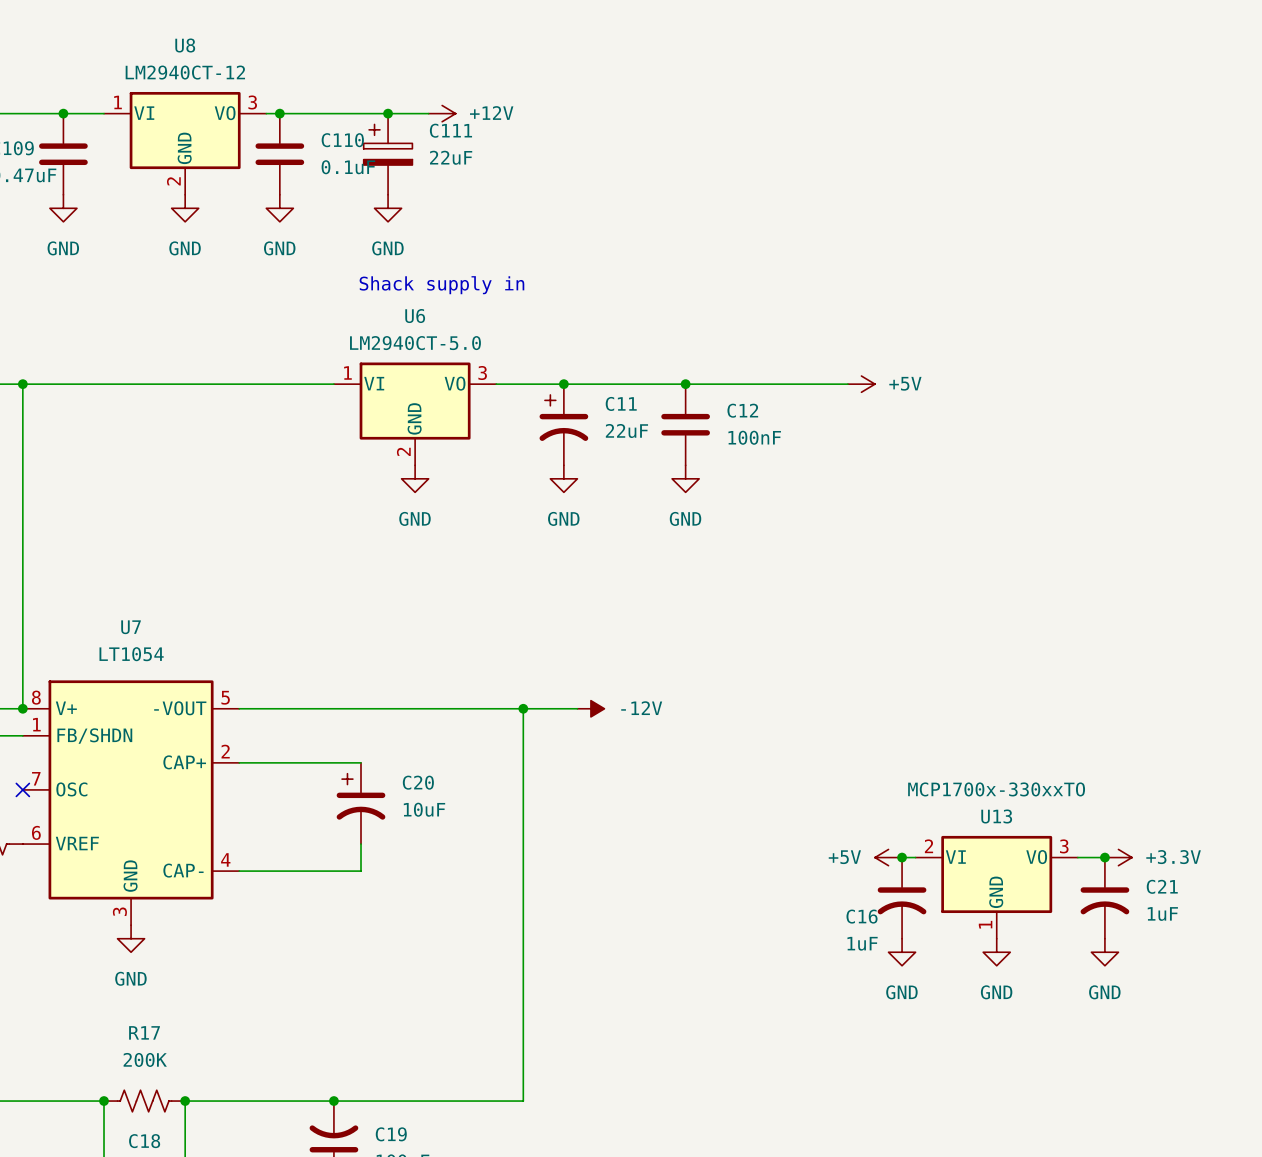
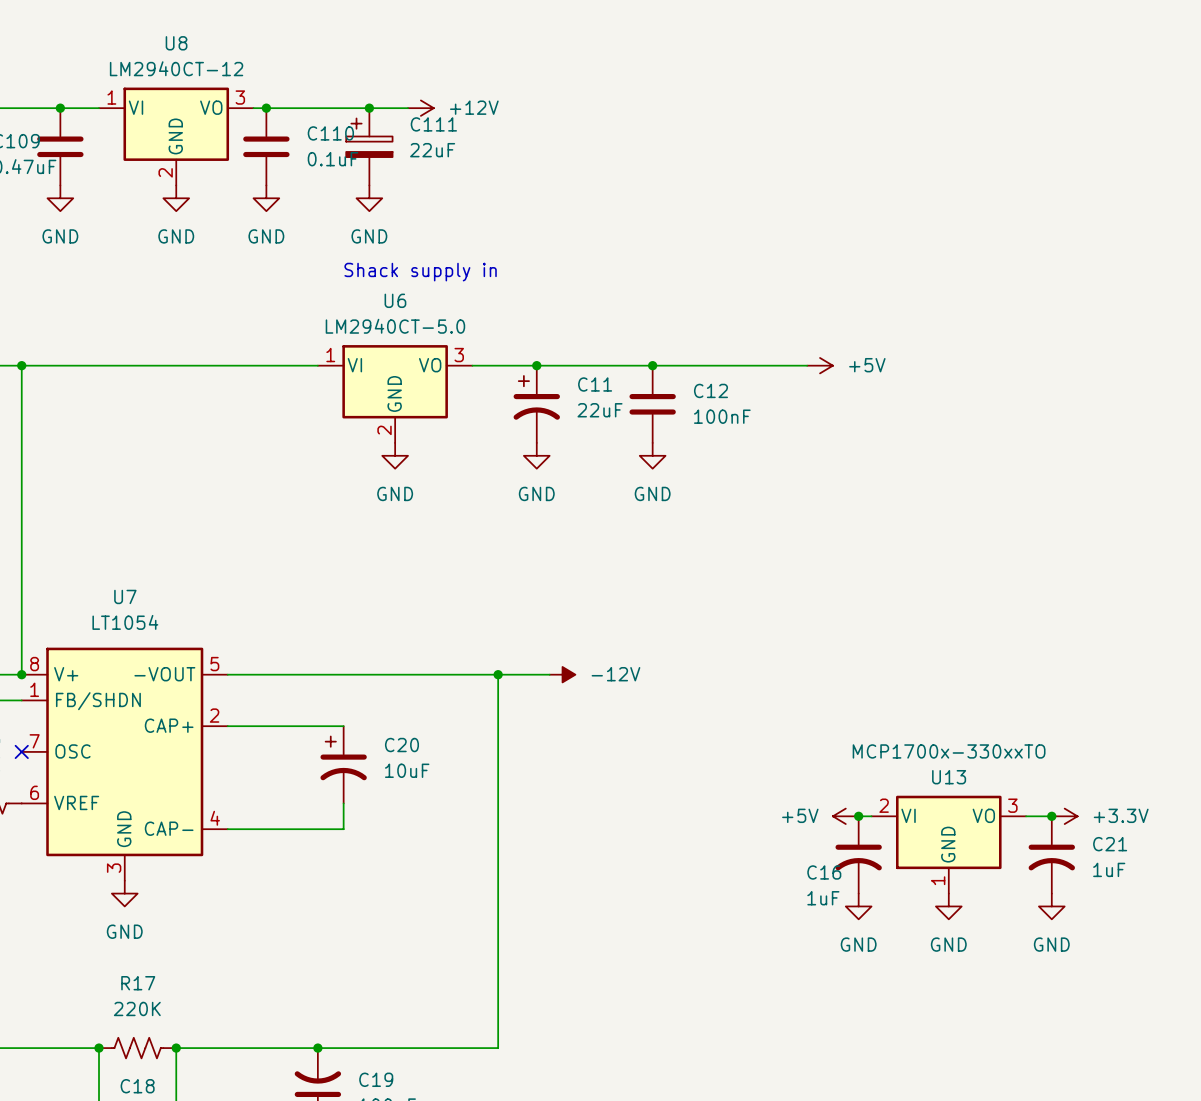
R17 value: 200K (145, 1059) -> 220K (137, 1008)

